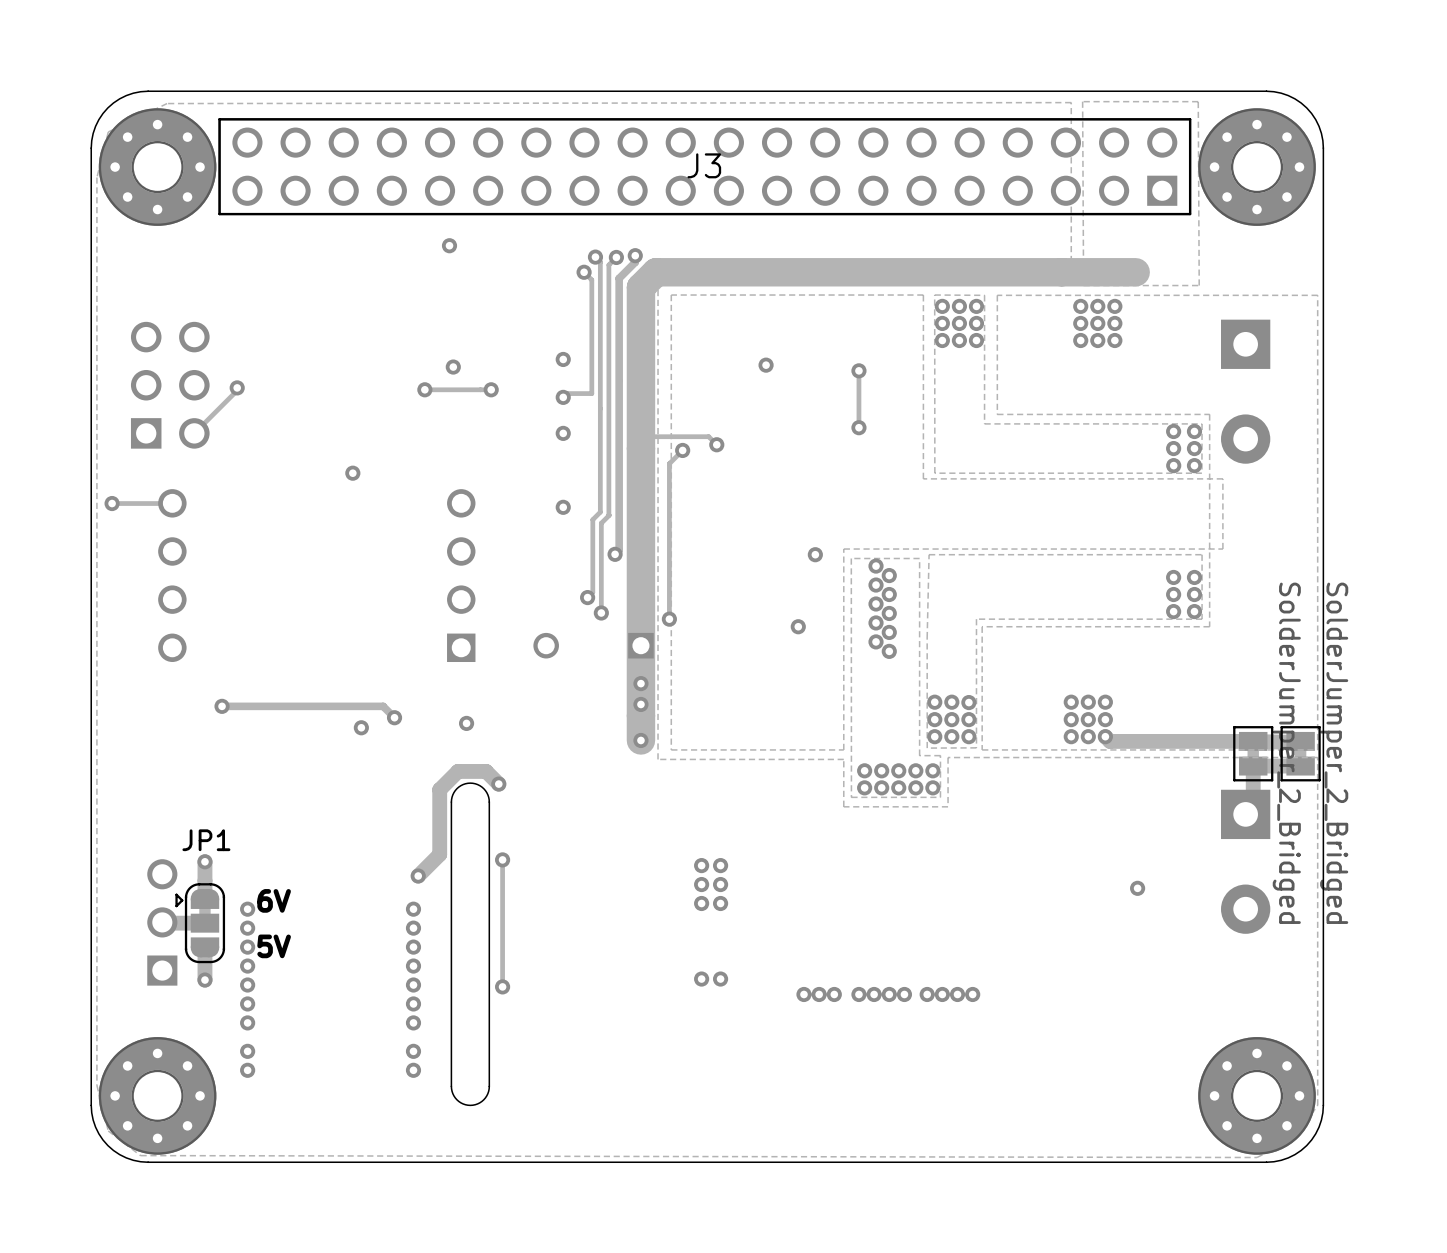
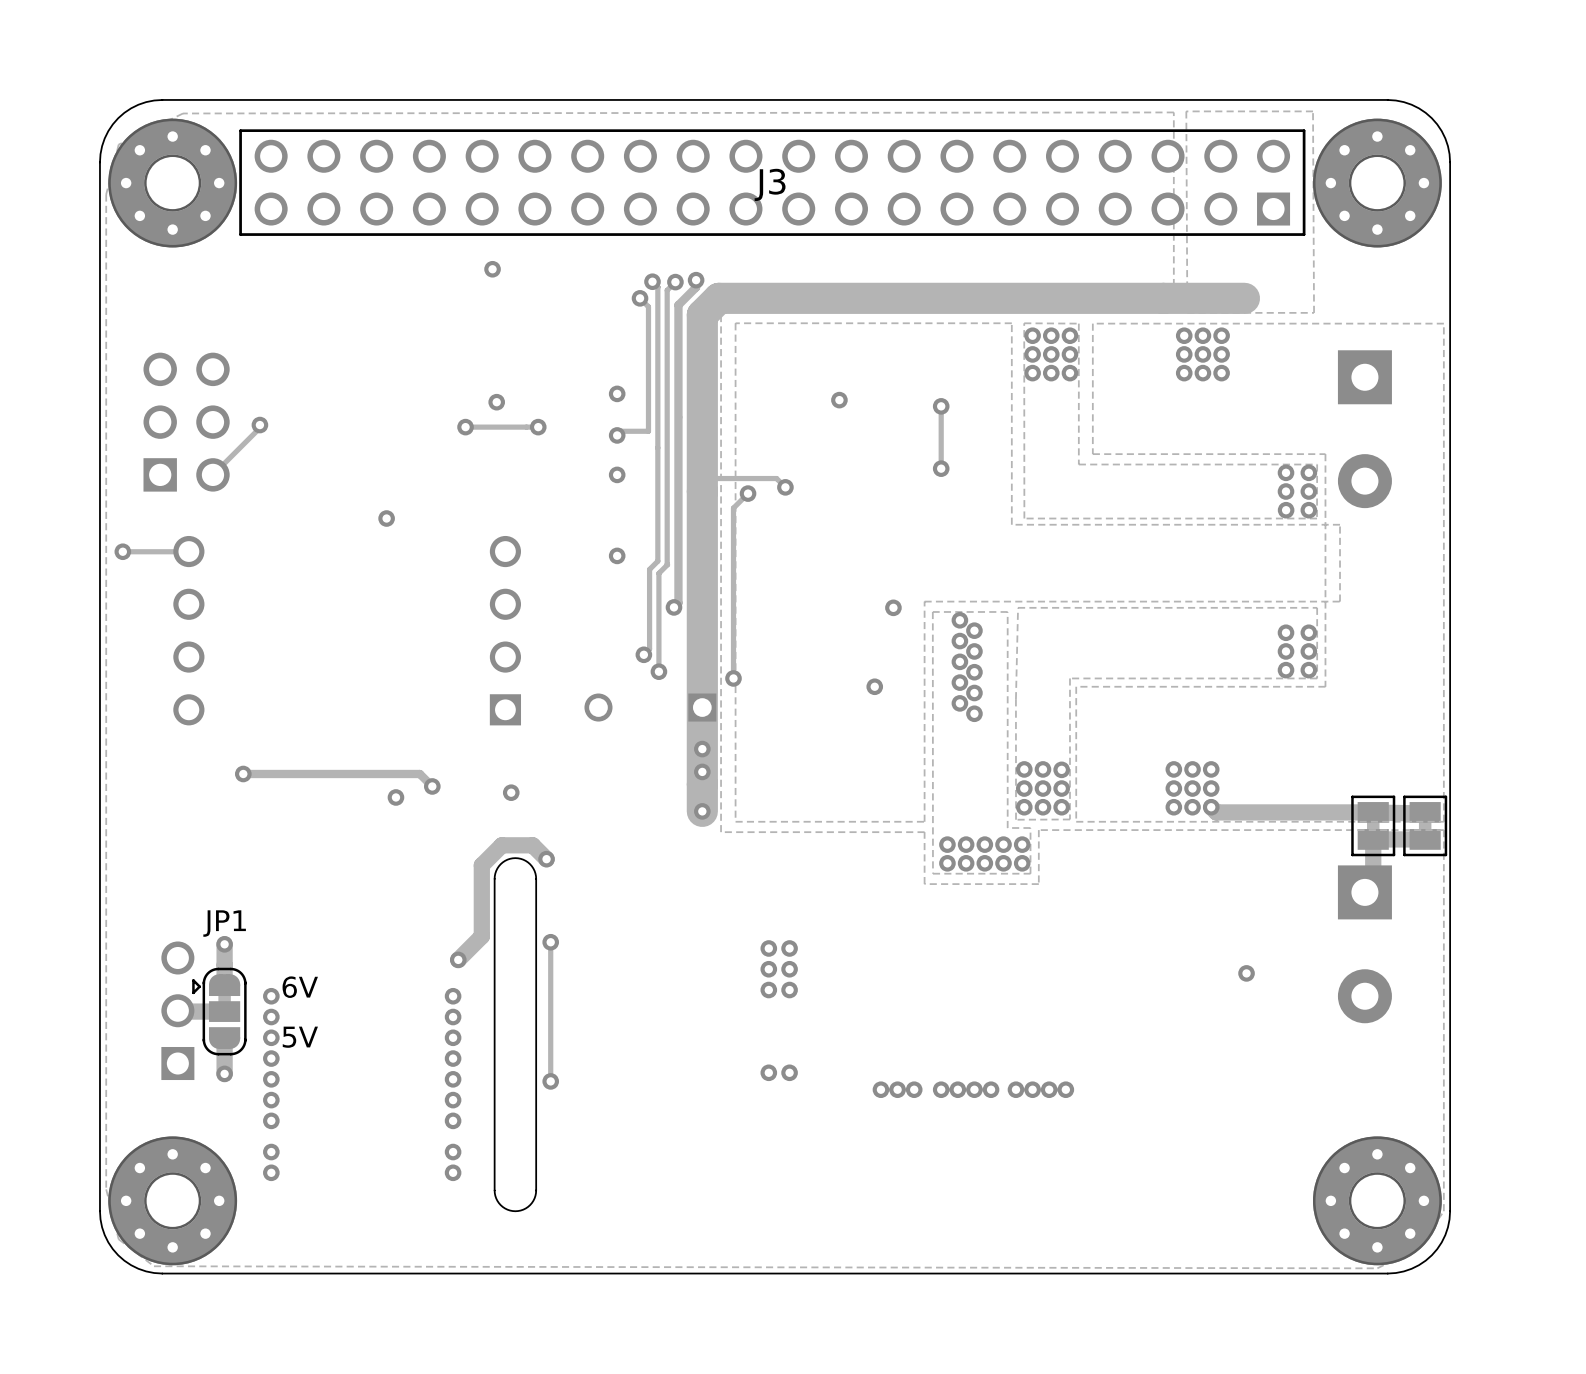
part value: SolderJumper_2_Bridged (1286, 753) -> none
part value: SolderJumper_2_Bridged (1334, 753) -> none

